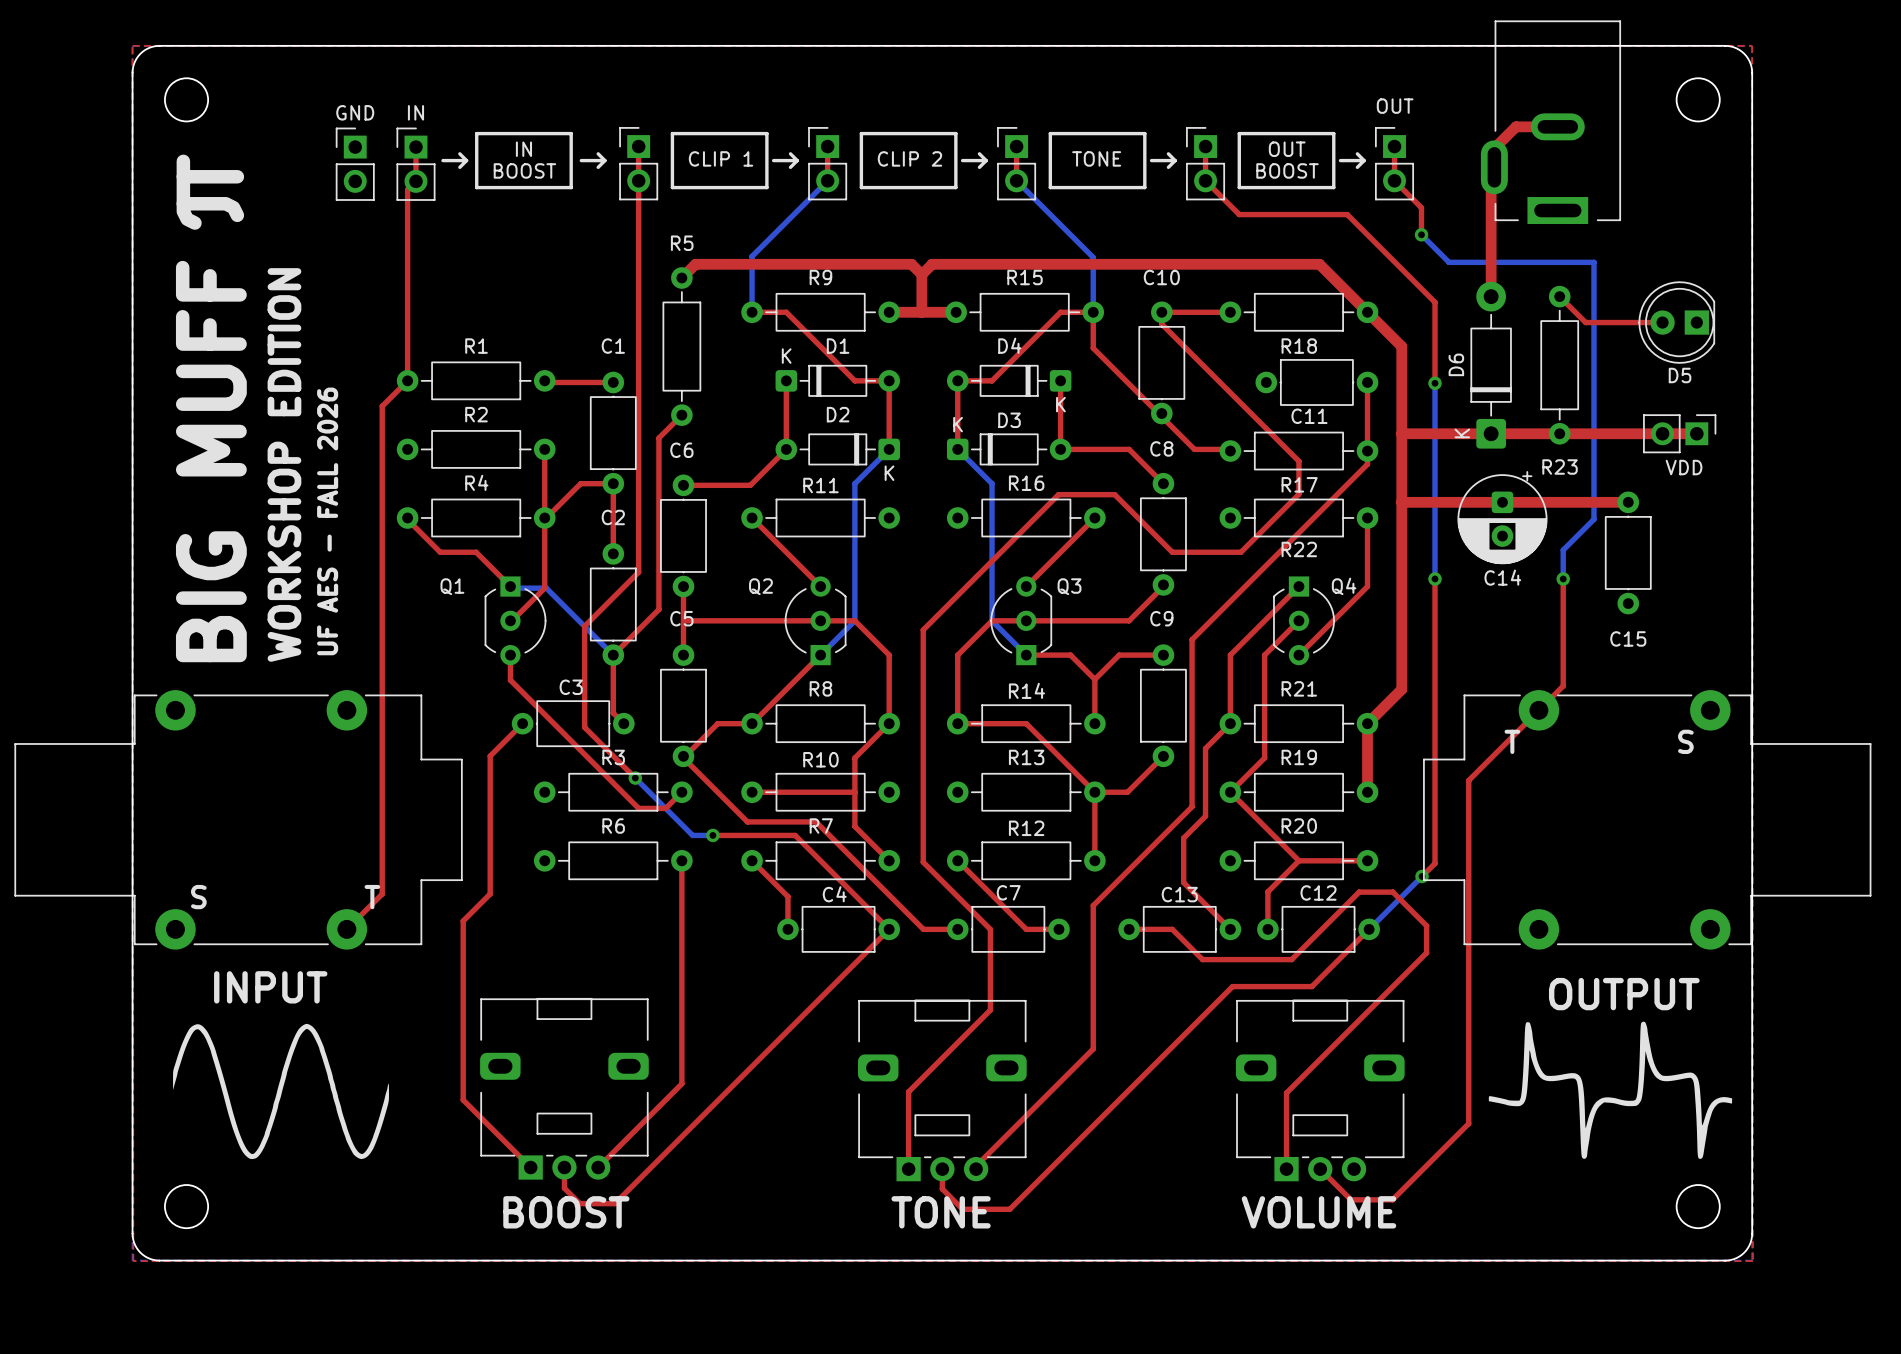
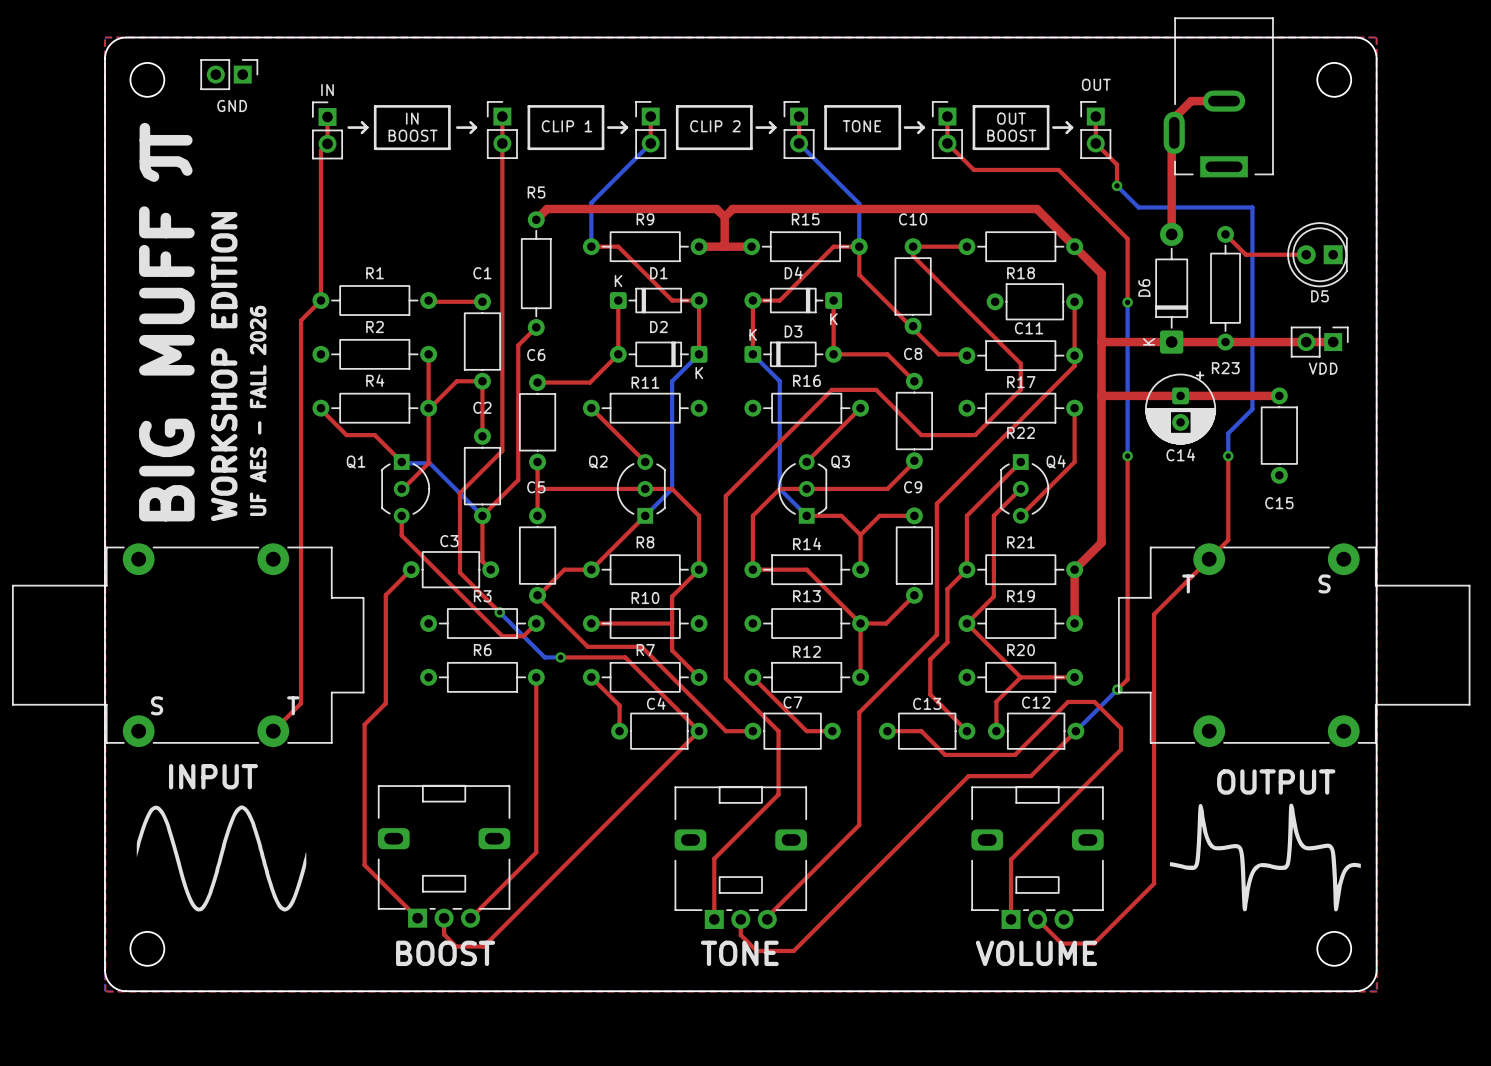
GND name position: GND (355, 112) -> GND (232, 105)
GND rotation: 0° (355, 164) -> 90° clockwise (229, 74)
GND position: (355, 164) -> (229, 74)

